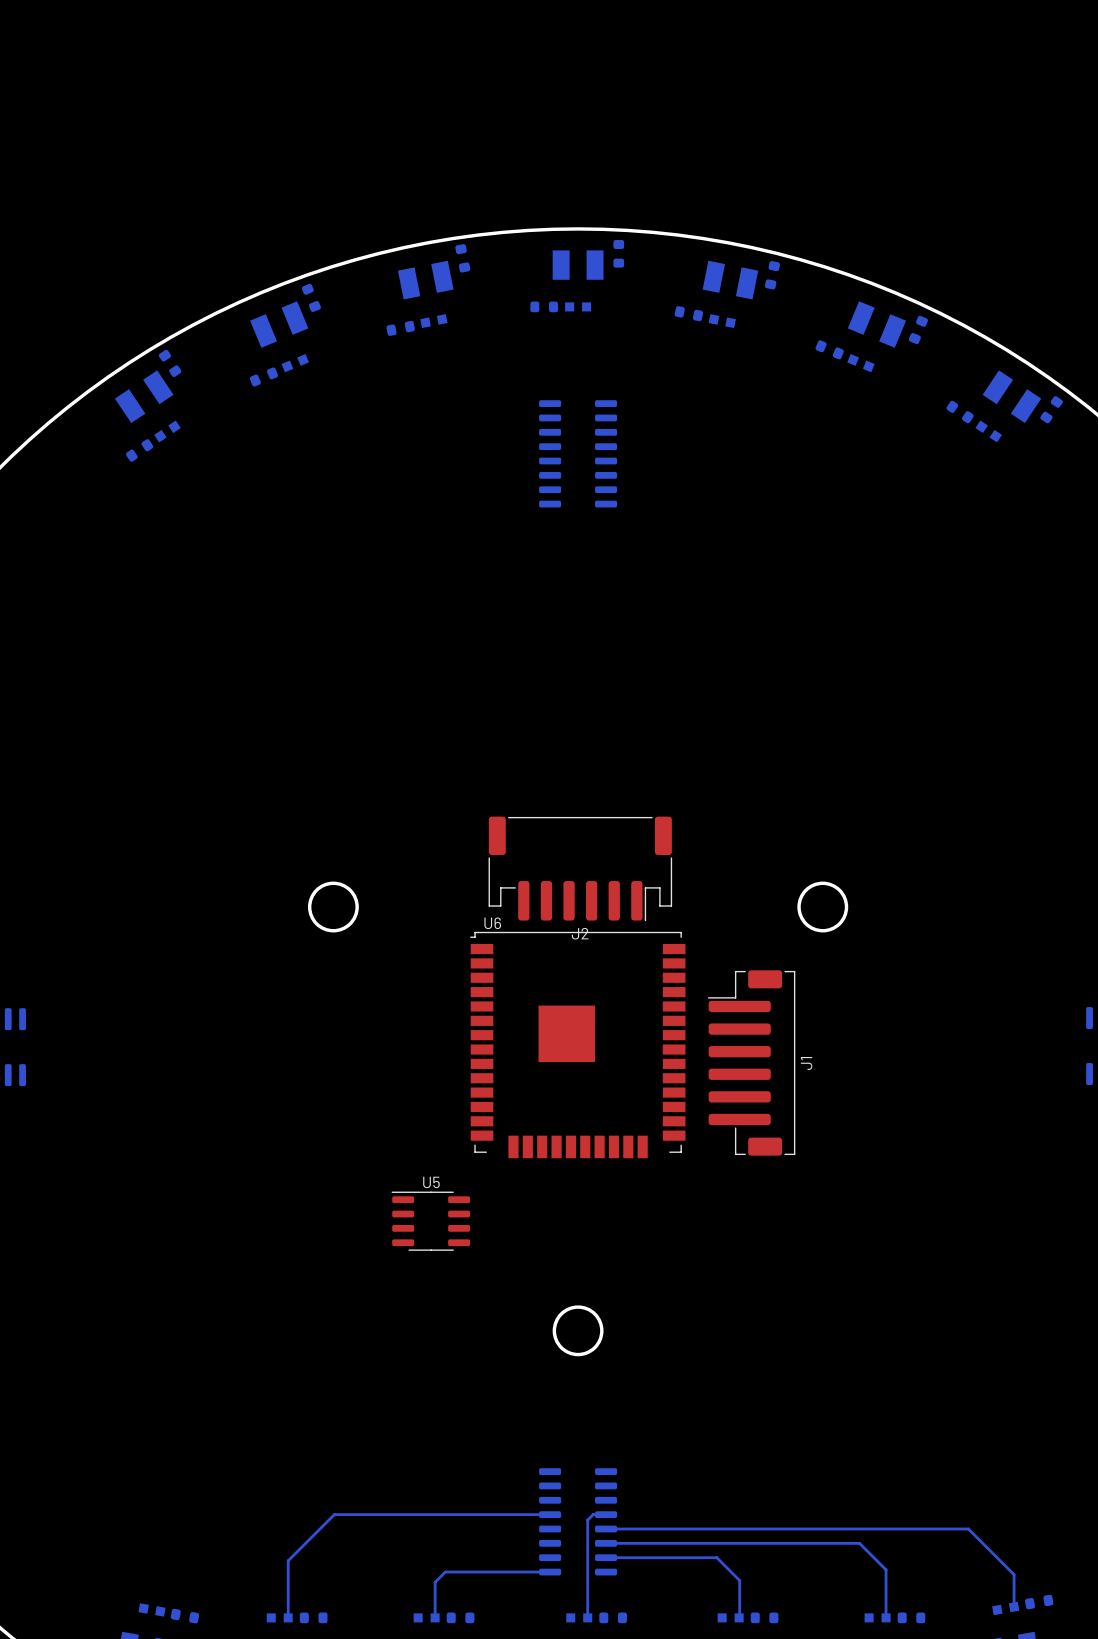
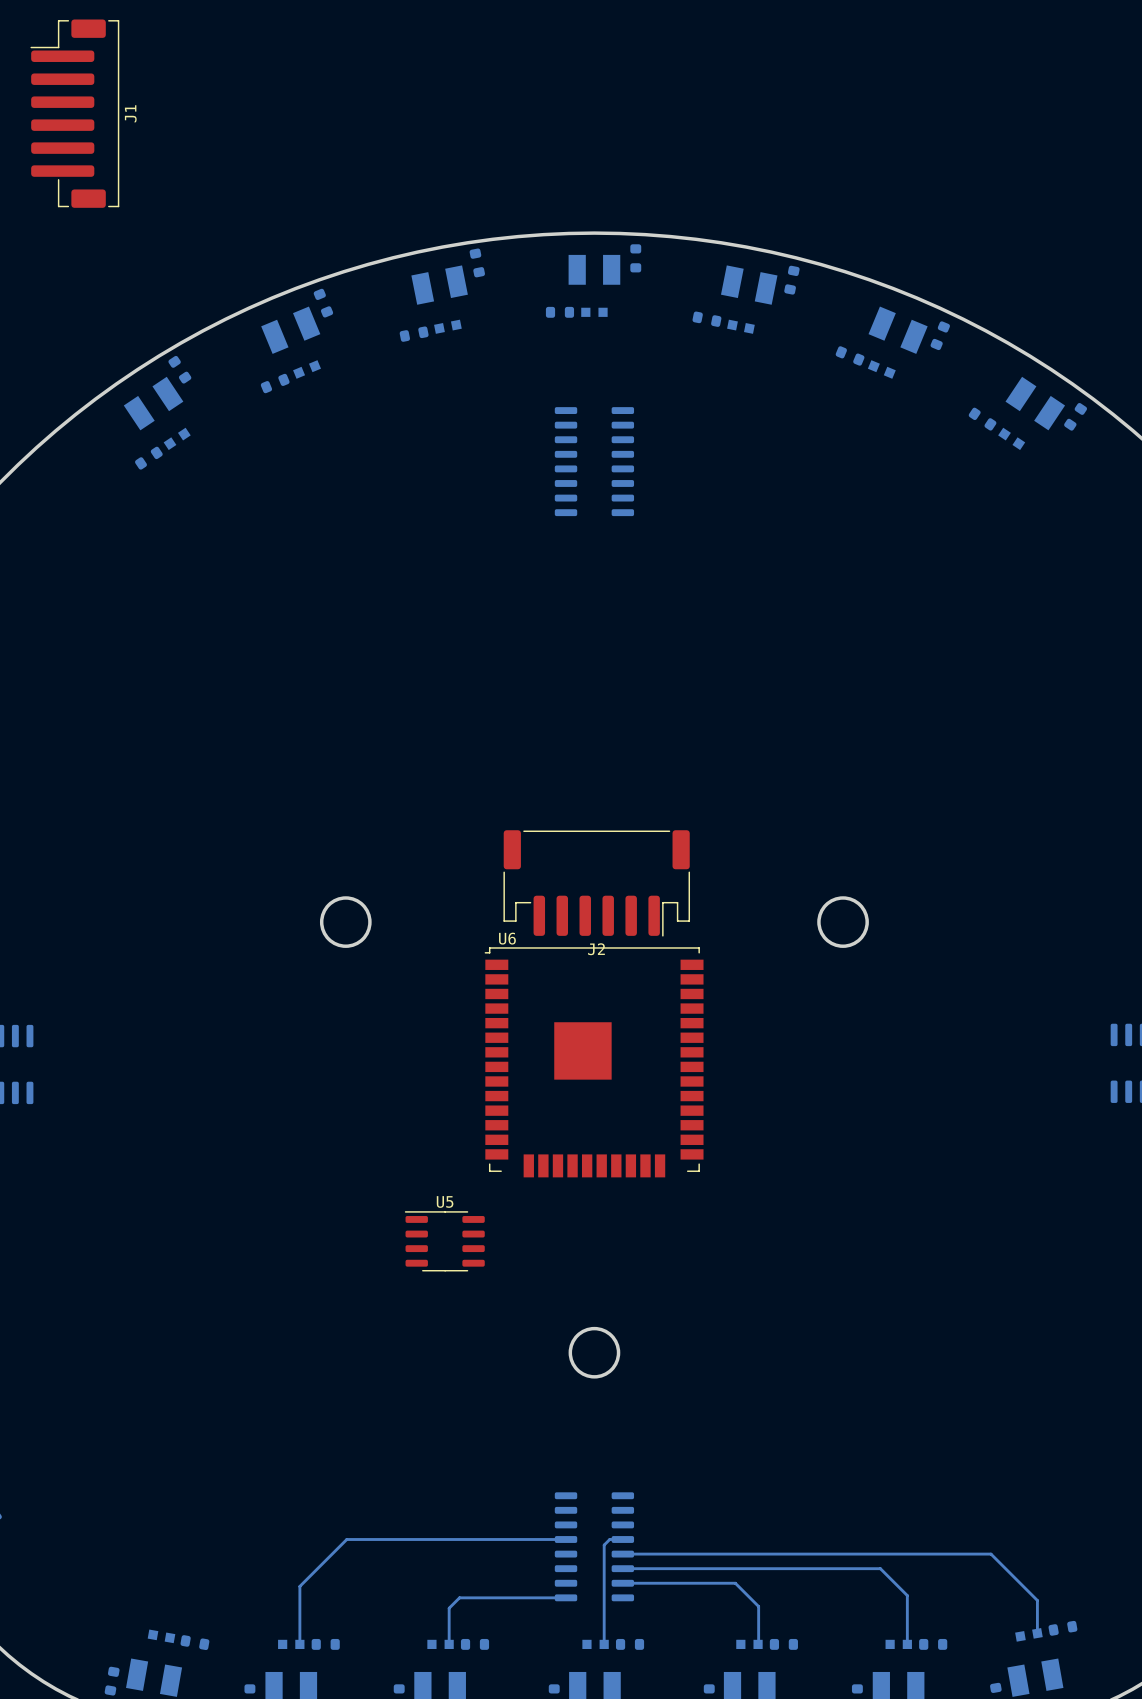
J1 position: (751, 1062) -> (74, 113)

